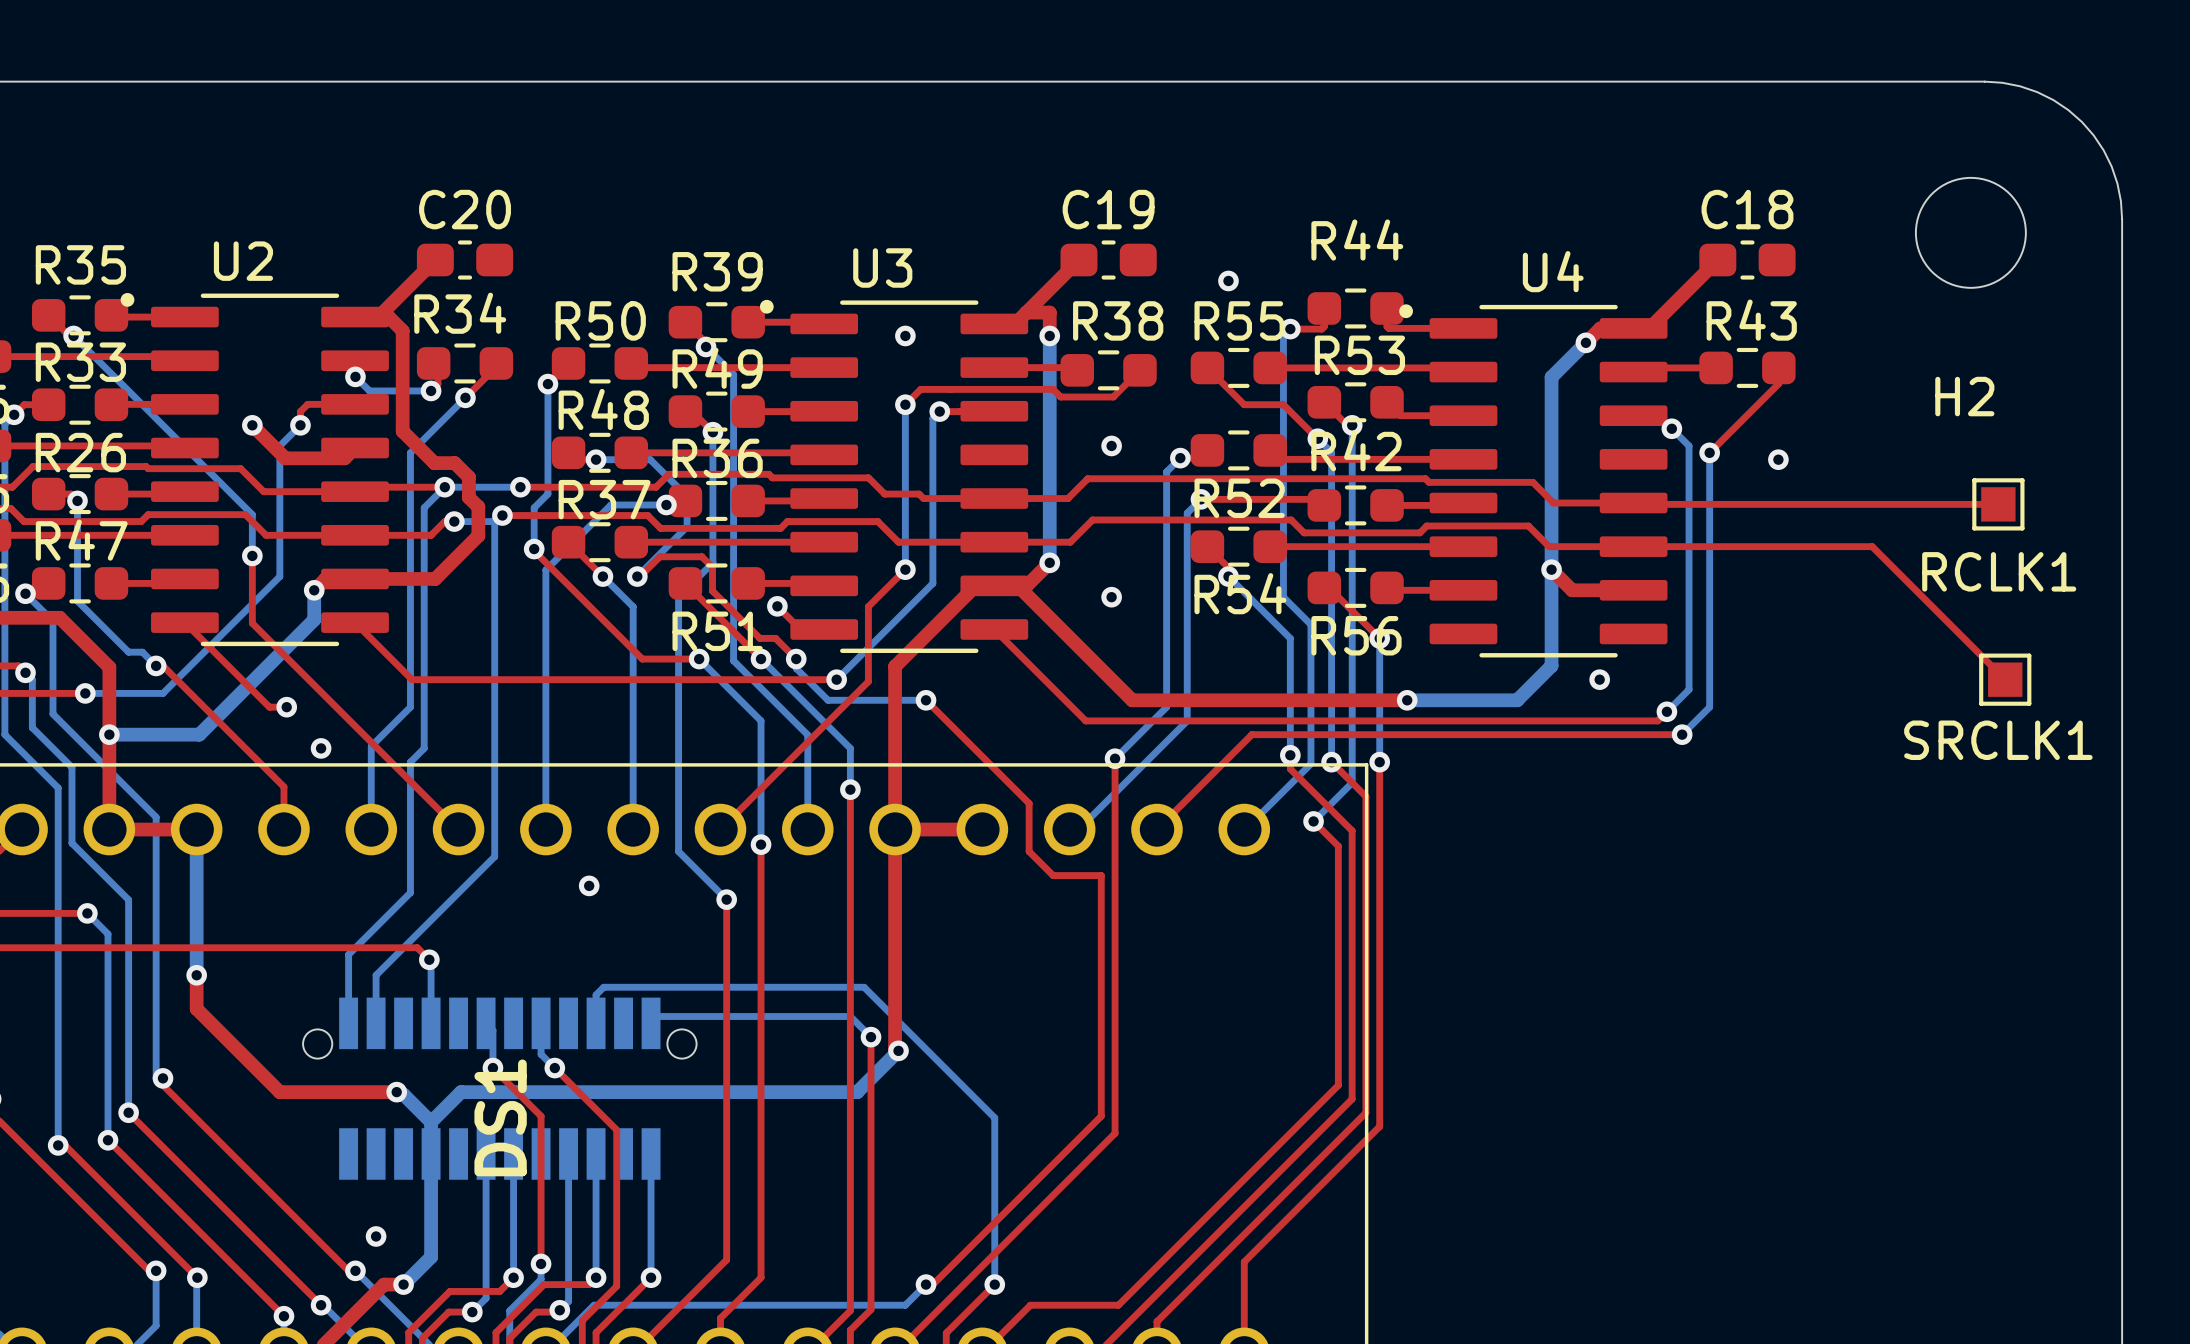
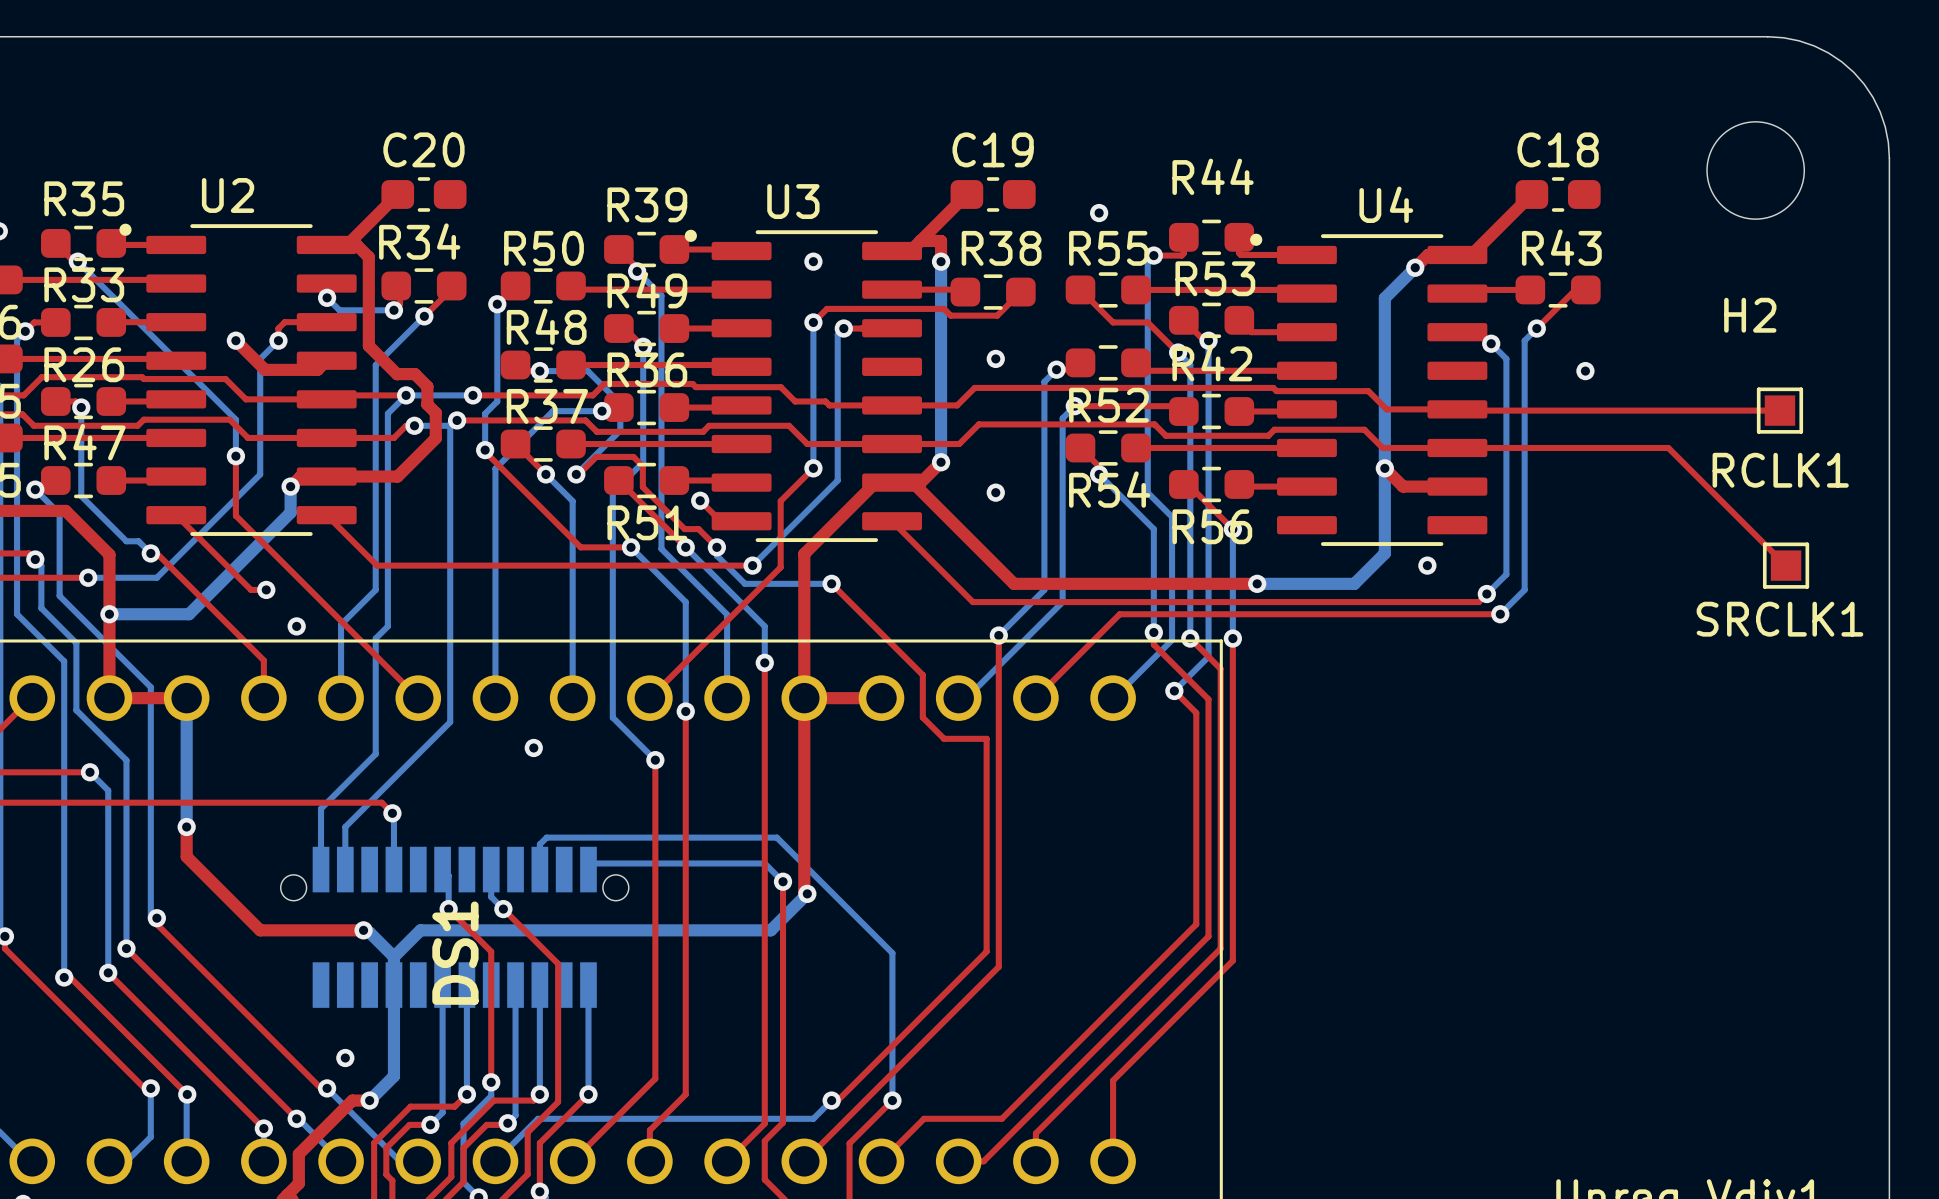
top track: (1778, 367) (1778, 383) (1709, 452) -> (1585, 289) (1575, 289) (1536, 328)
bottom track: none -> (1536, 328) (1524, 340) (1524, 365)
via position: (1709, 452) -> (1536, 328)

